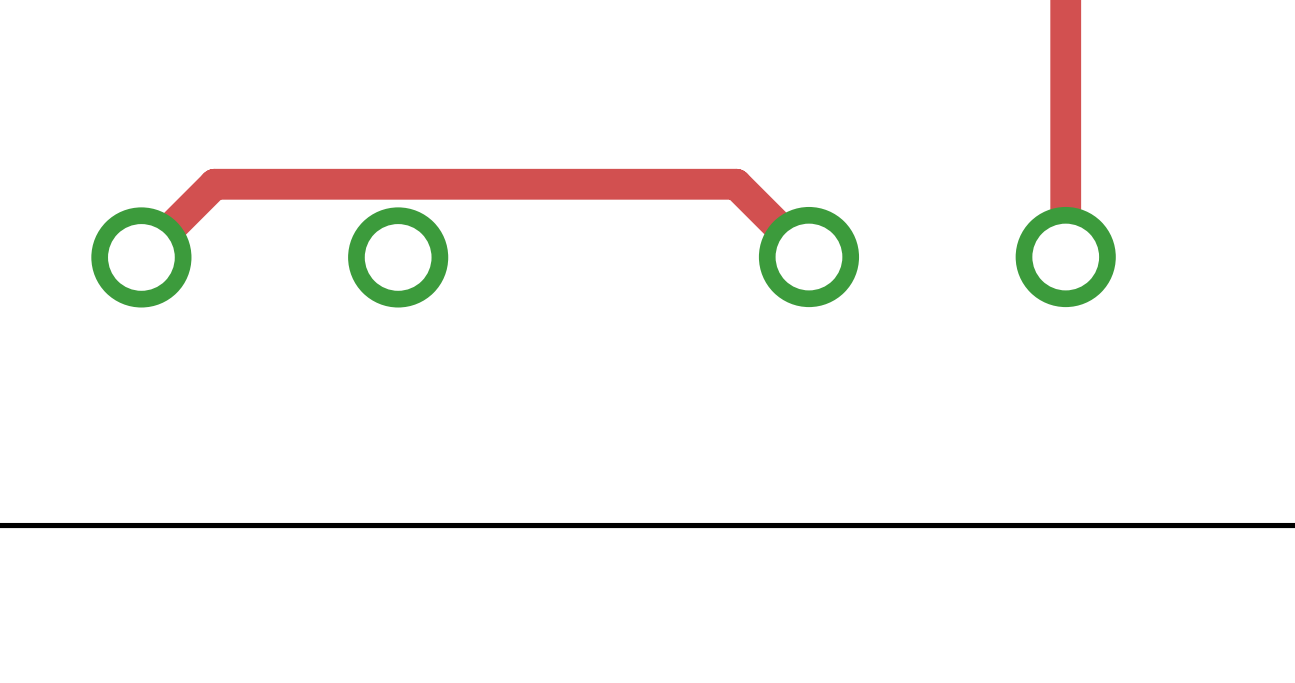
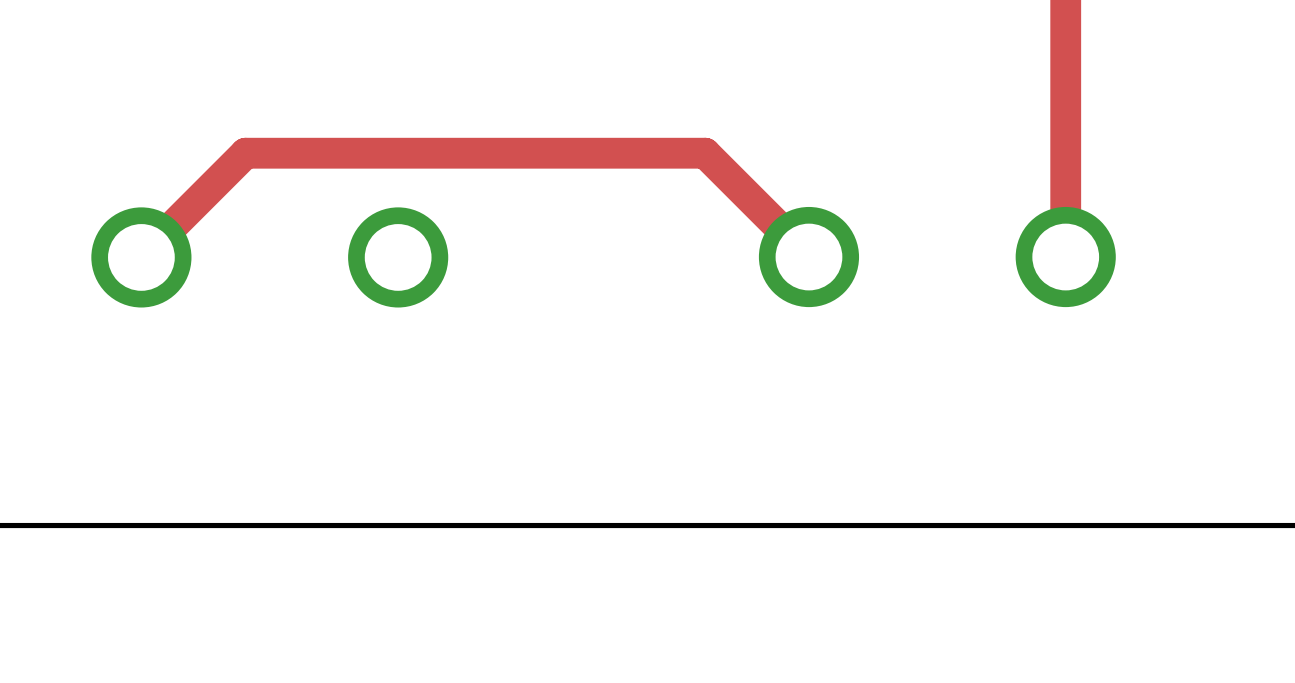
top track: (736, 184) (214, 184) -> (736, 184) (705, 153) (245, 153) (214, 184)

